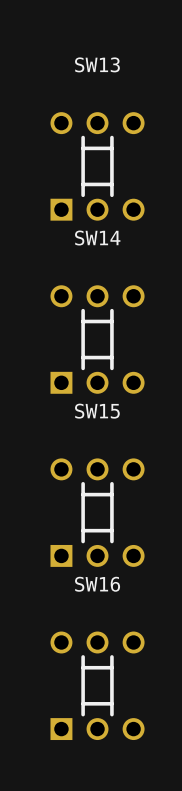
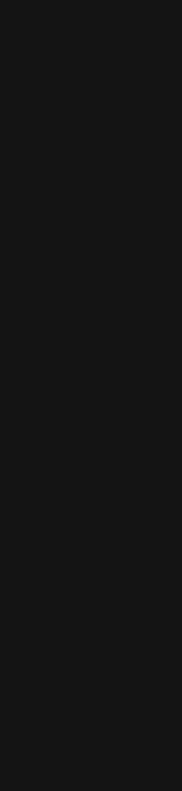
SW13: (97, 166) -> none
SW14: (97, 339) -> none
SW15: (97, 512) -> none
SW16: (97, 685) -> none

